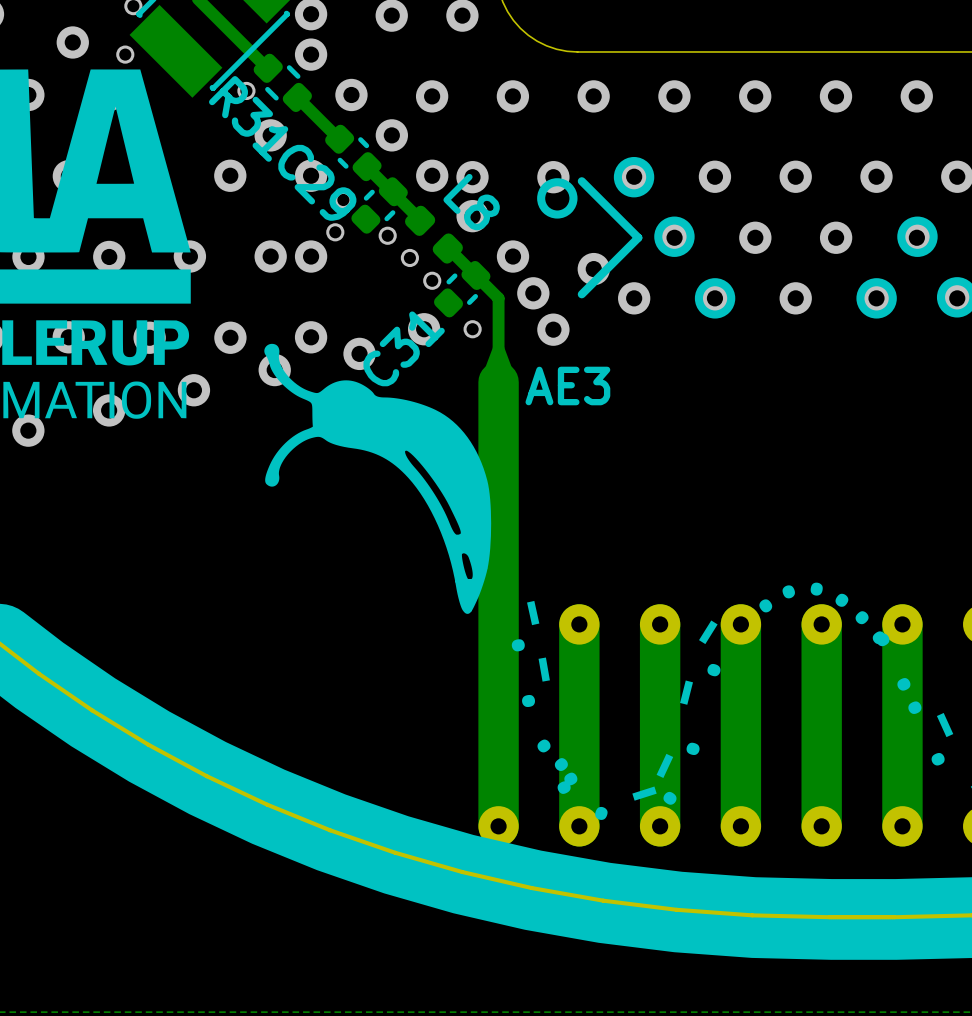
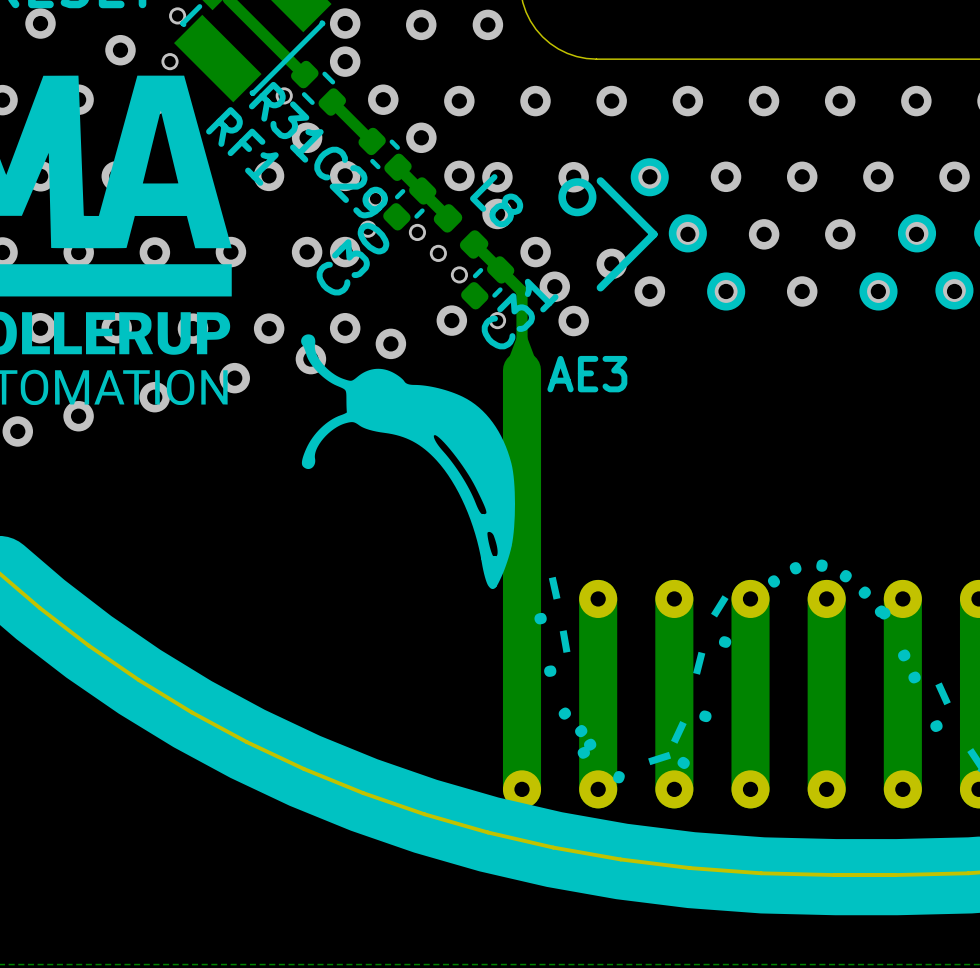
RF1 name: none -> RF1 (242, 146)
C30 name: none -> C30 (352, 259)
C31 name position: C31 (404, 348) -> C31 (520, 314)

